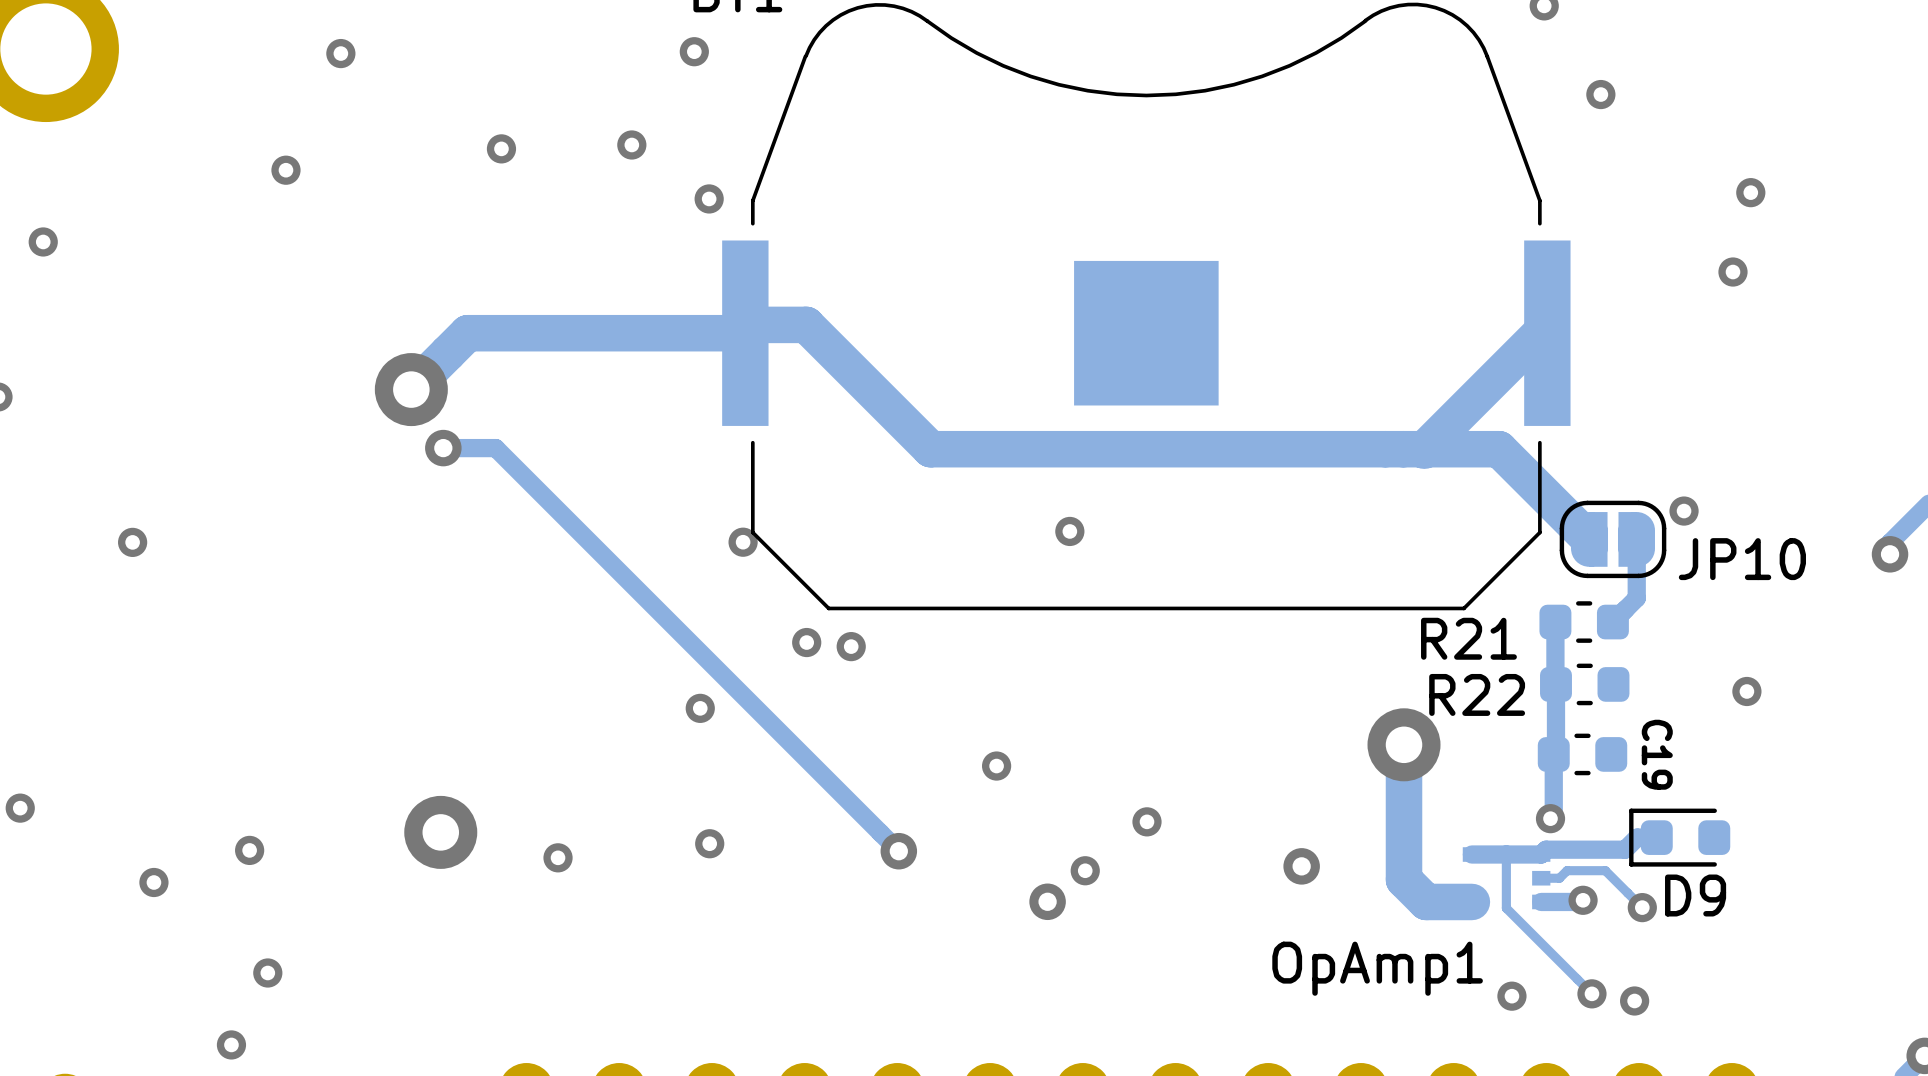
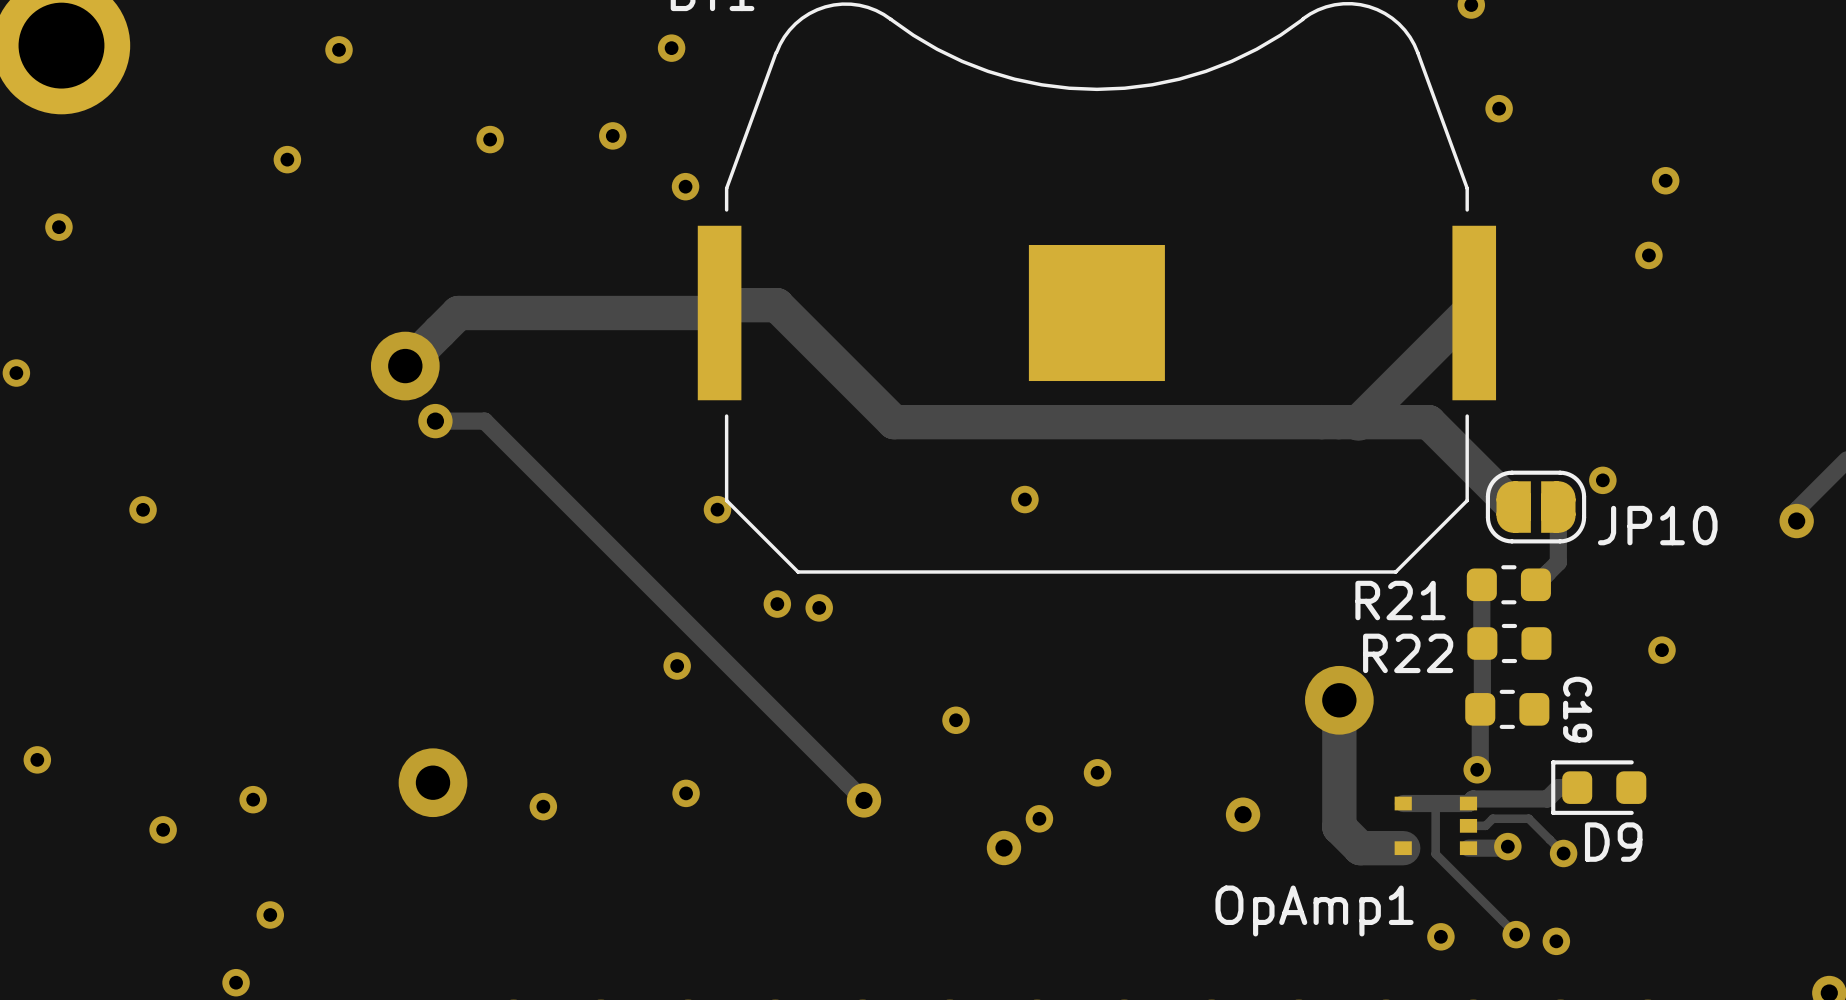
via position: (1600, 94) -> (1499, 108)

